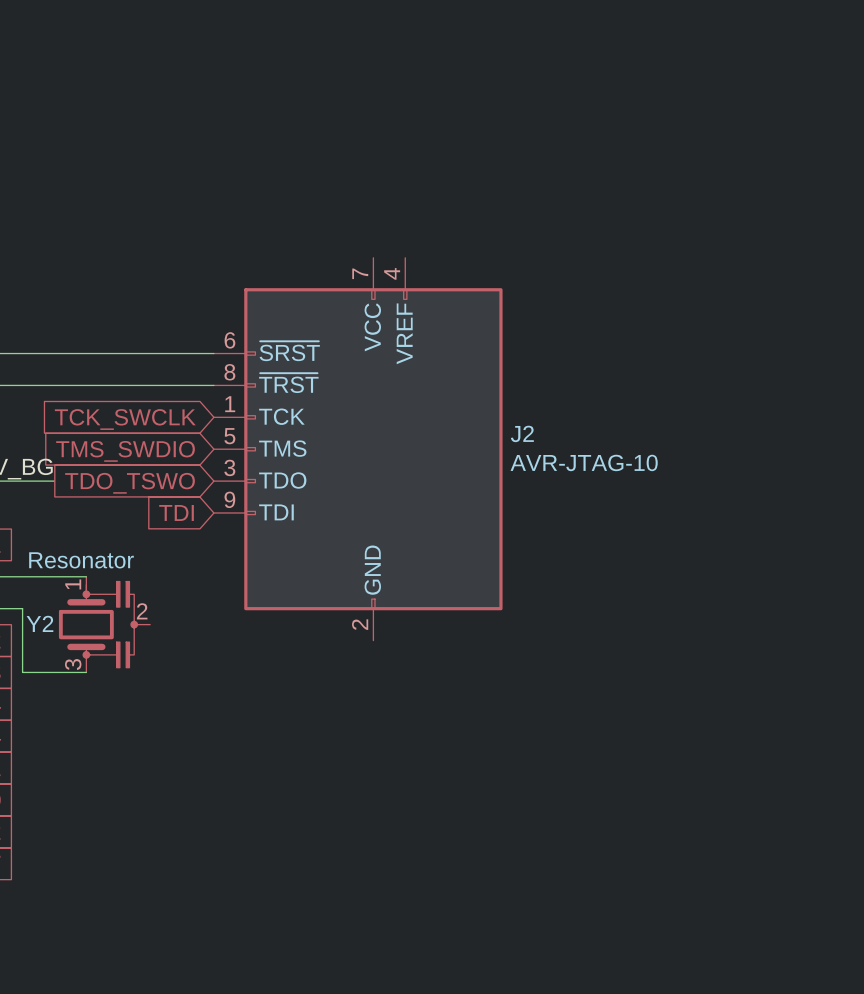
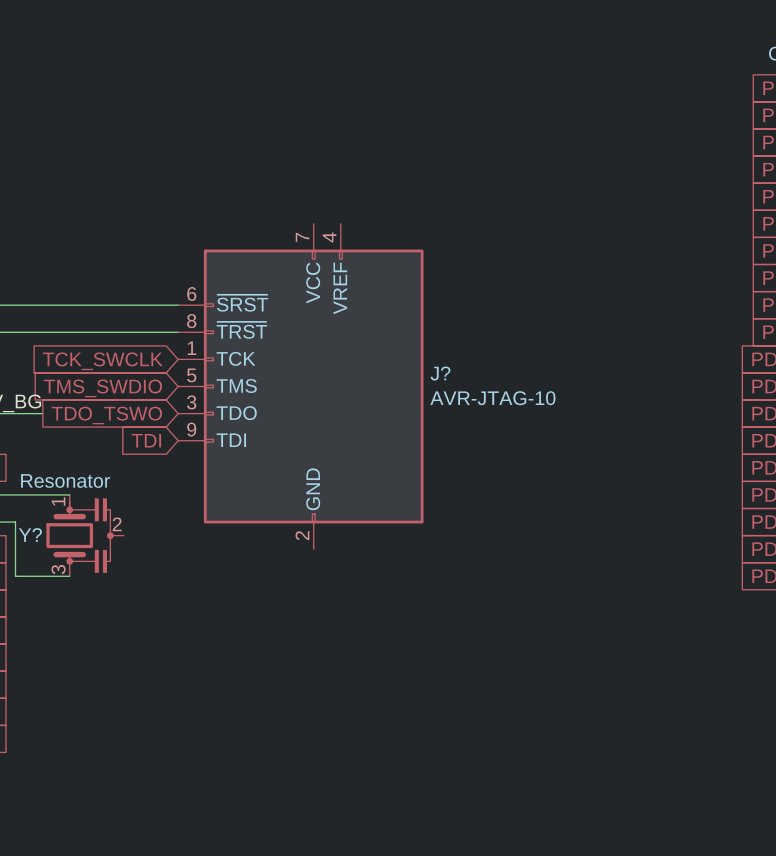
J2 name: J2 (522, 433) -> J? (440, 373)
Y2 name: Y2 (39, 623) -> Y? (30, 535)

